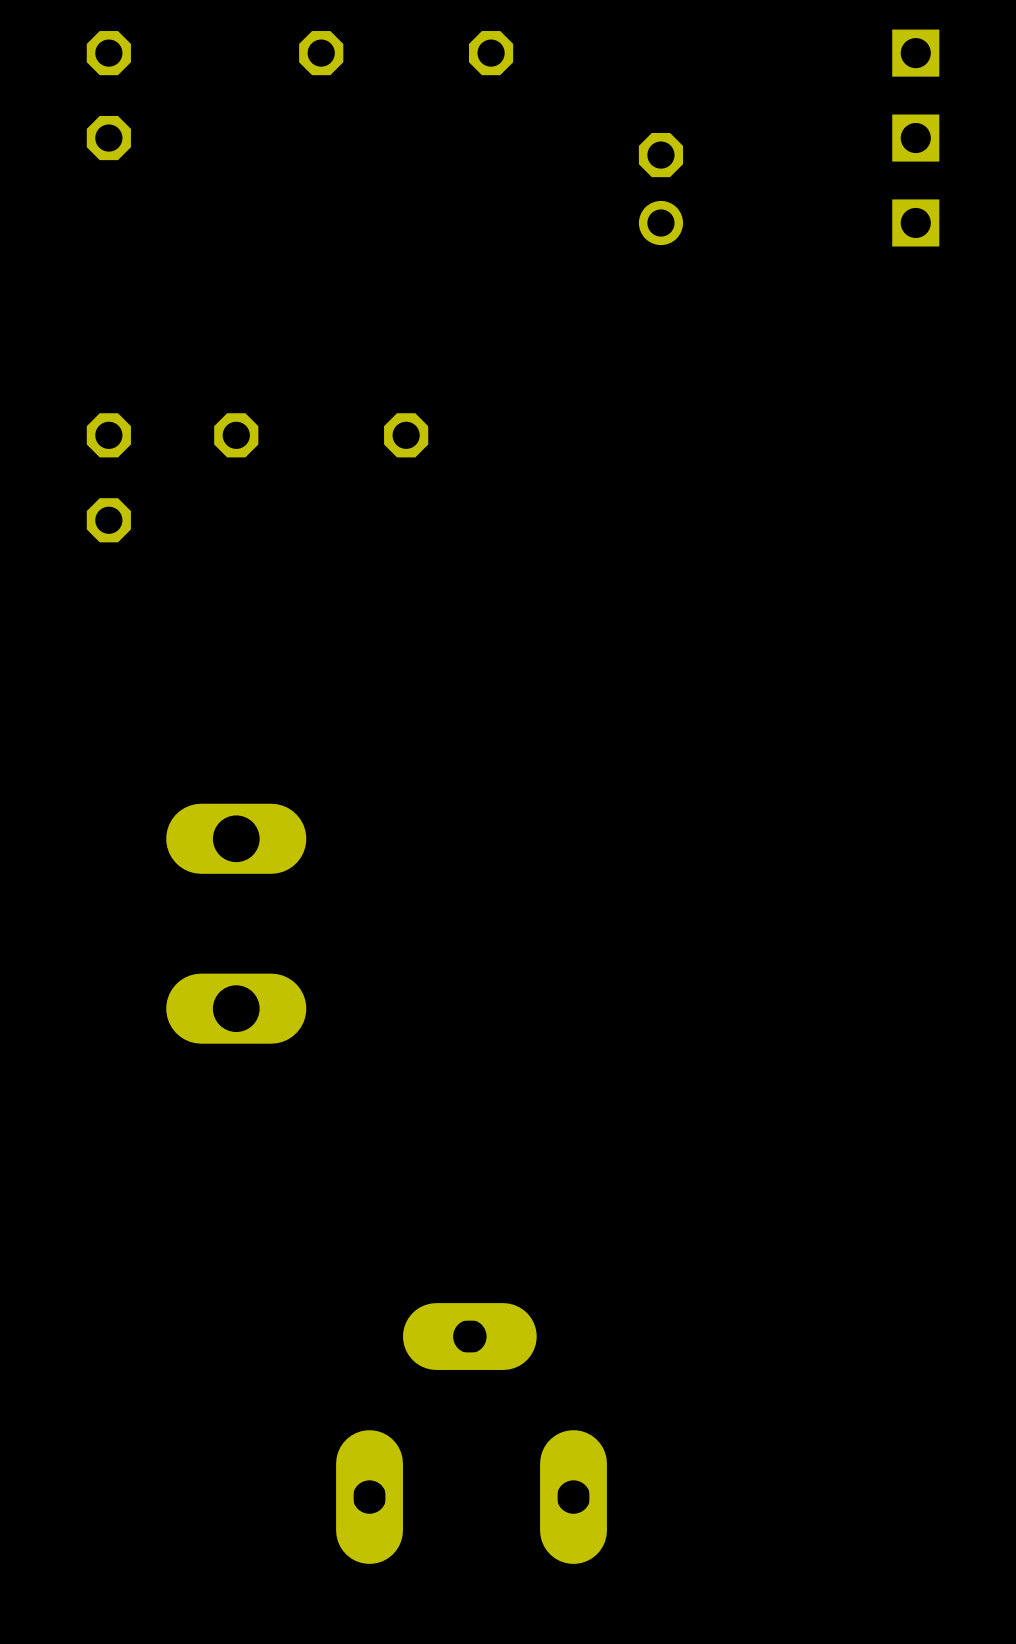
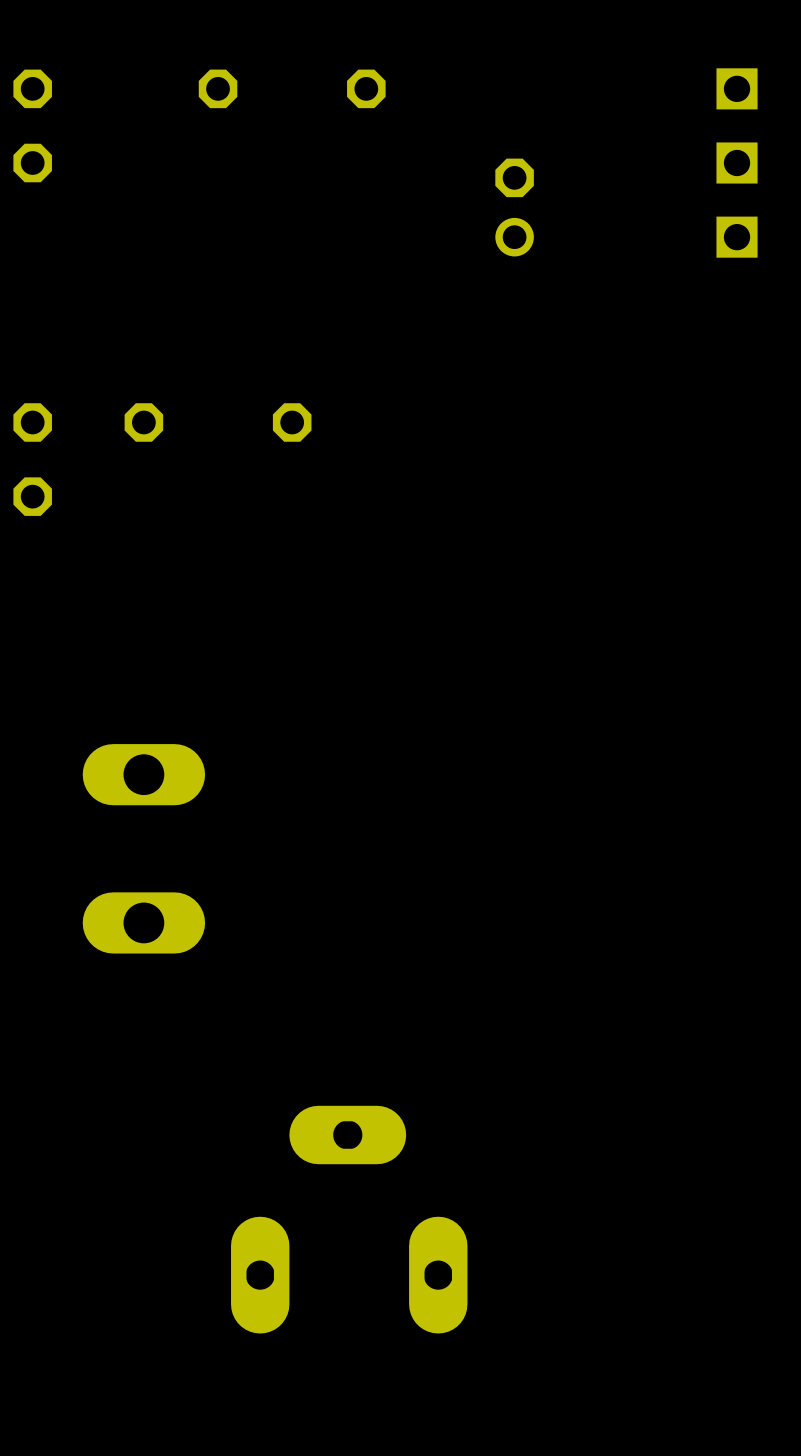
part position: (471, 1433) -> (349, 1219)

